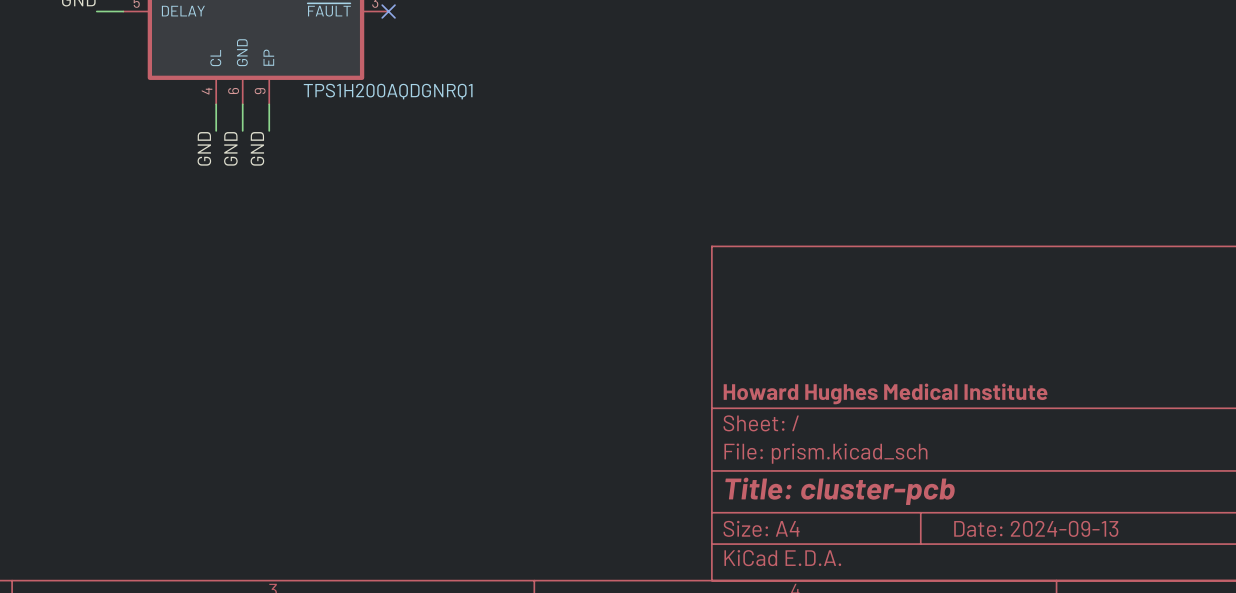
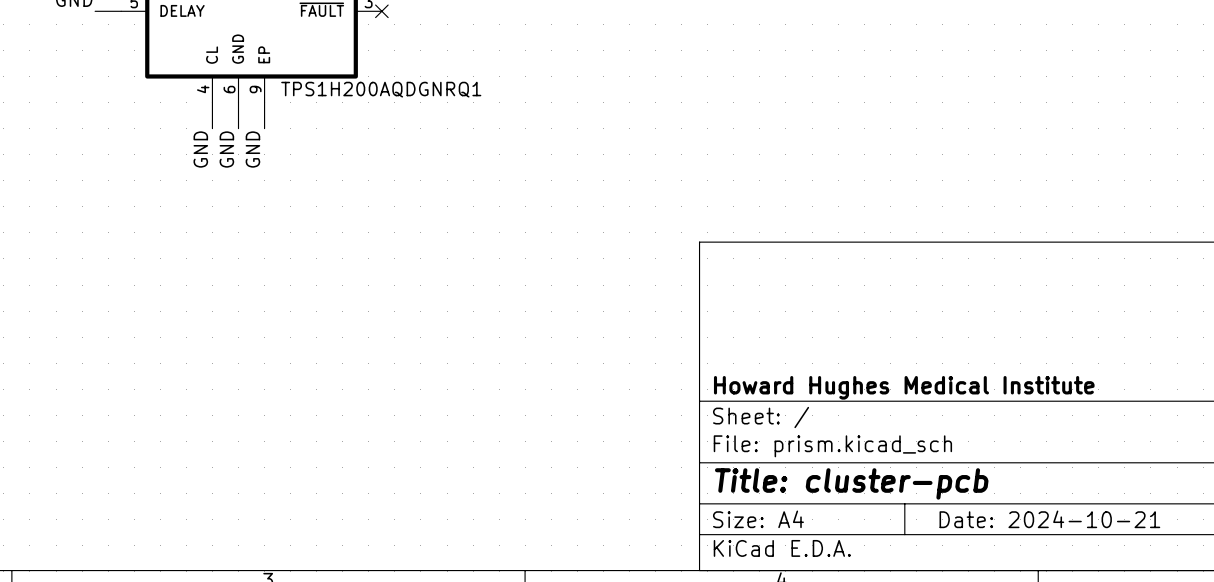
title block: Date: 2024-09-13 (1036, 528) -> Date: 2024-10-21 (1049, 519)

